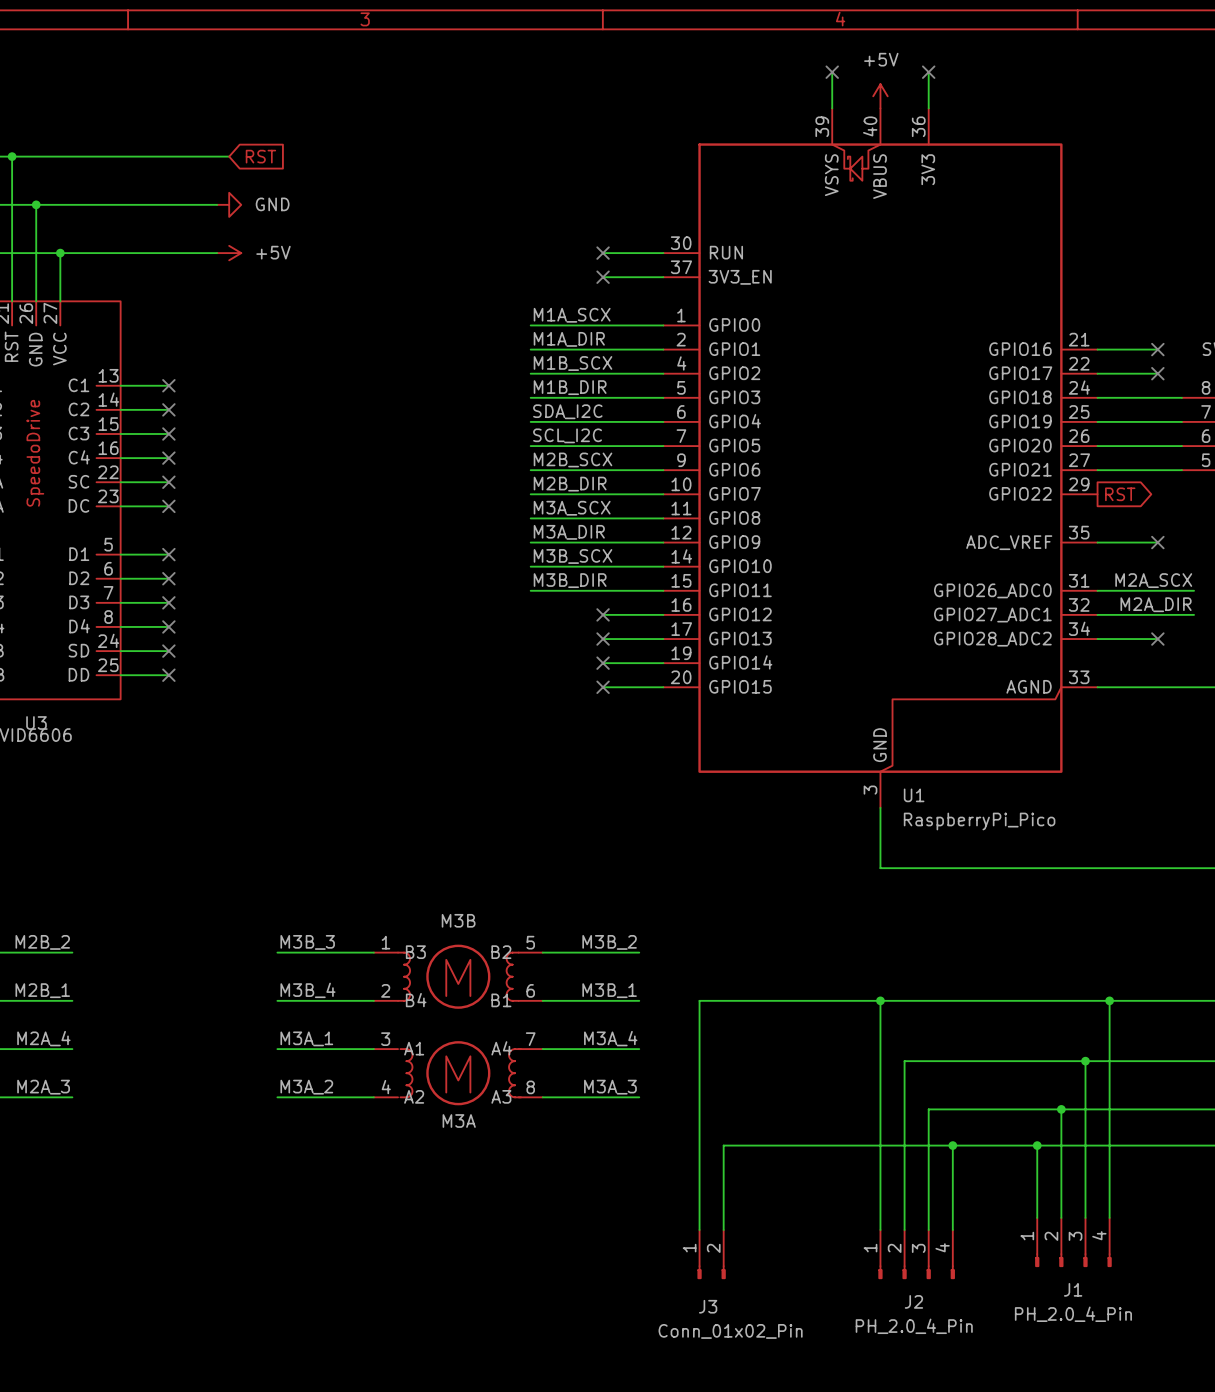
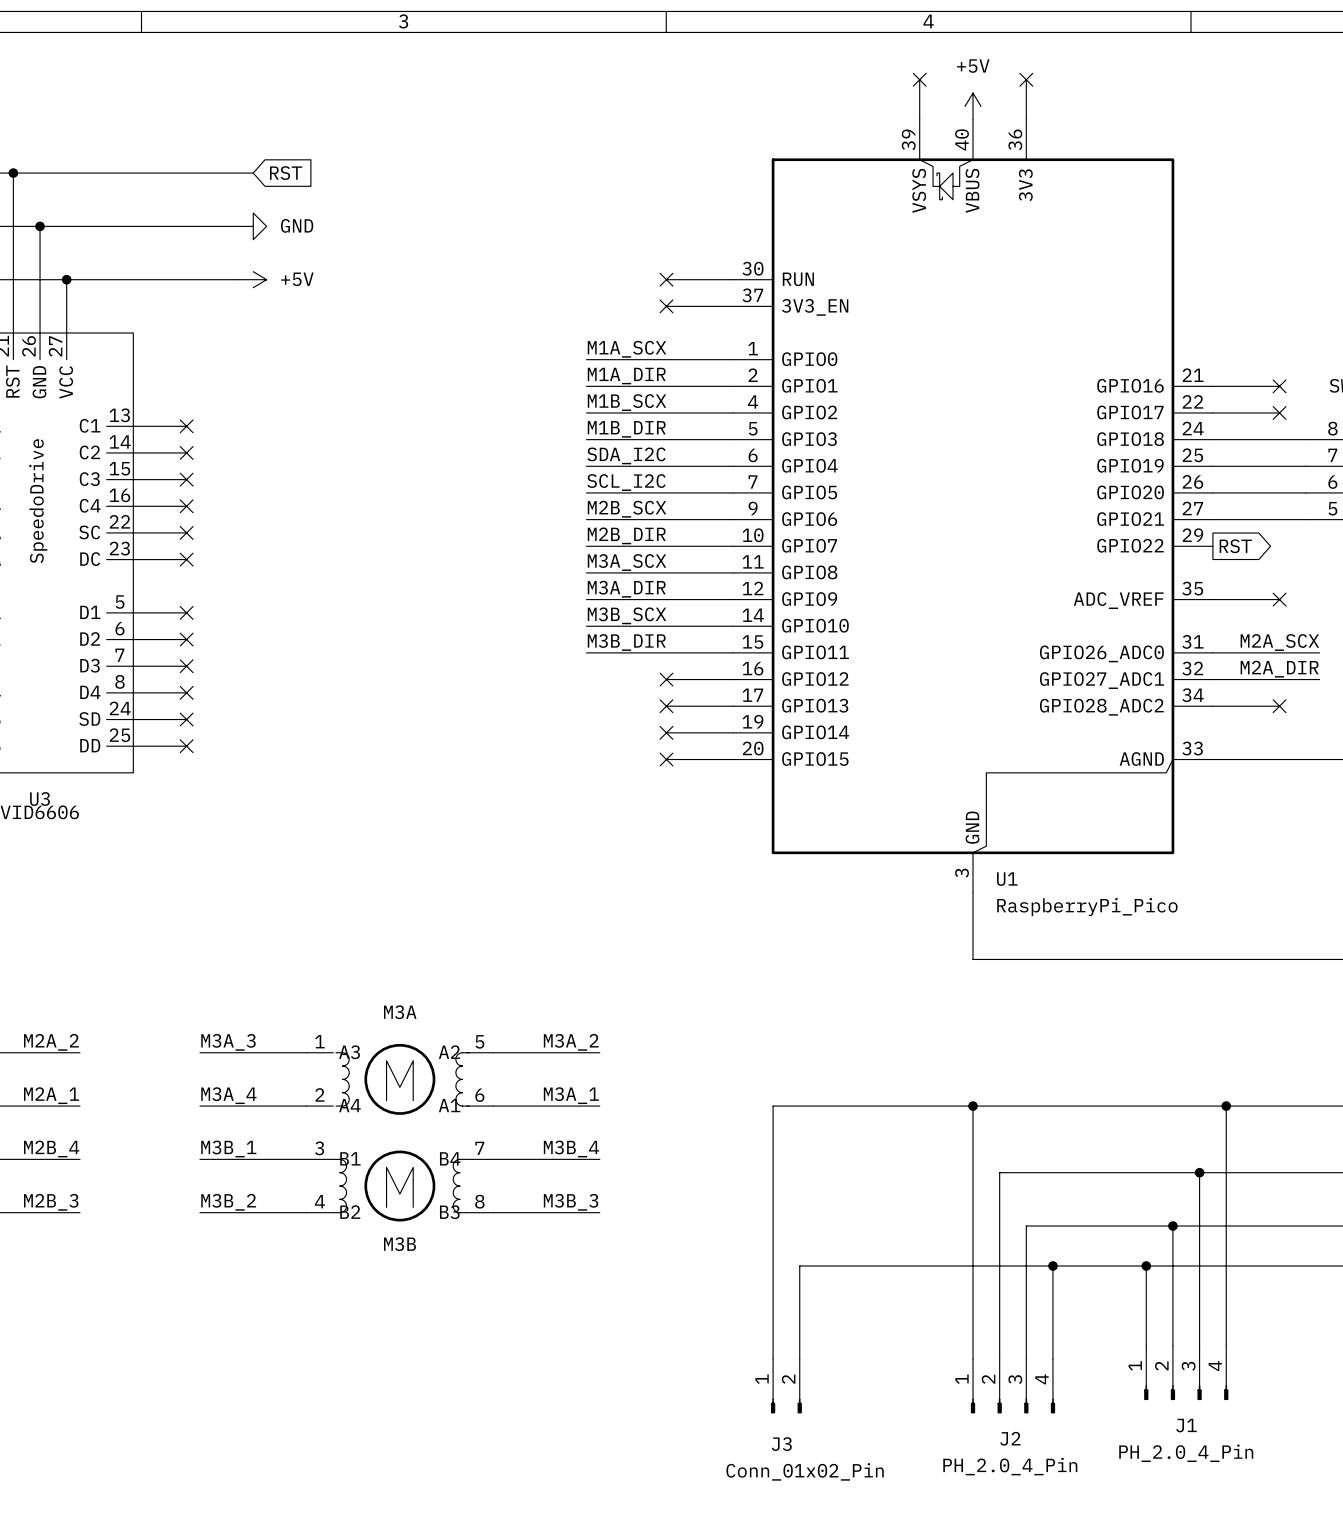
M3B name position: M3B (458, 920) -> M3B (399, 1244)
label: M2B_2 (42, 942) -> M2A_2 (51, 1042)
label: none -> M3A_3 (228, 1042)
label: M3B_3 (307, 942) -> none
M3B pin number: 1 (385, 942) -> 3 (319, 1148)
label: none -> M3A_2 (571, 1042)
M3B pin number: 5 (530, 942) -> 7 (479, 1148)
label: M3B_2 (609, 942) -> none
wire: (277, 952) (373, 952) -> (306, 1052) (199, 1052)
M3B pin name: B3 (415, 952) -> B1 (350, 1158)
M3B pin name: B2 (501, 952) -> B4 (450, 1158)
wire: (542, 952) (639, 952) -> (599, 1052) (493, 1052)
M3B position: (458, 976) -> (399, 1186)
label: M2B_1 (42, 990) -> M2A_1 (51, 1095)
label: none -> M3A_4 (228, 1095)
label: M3B_4 (307, 990) -> none
M3B pin number: 2 (385, 990) -> 4 (319, 1201)
label: none -> M3A_1 (571, 1095)
M3B pin number: 6 (530, 990) -> 8 (479, 1201)
label: M3B_1 (609, 990) -> none
wire: (277, 1000) (373, 1000) -> (306, 1106) (199, 1106)
M3B pin name: B4 (416, 1000) -> B2 (350, 1212)
M3B pin name: B1 (501, 1000) -> B3 (449, 1212)
wire: (542, 1000) (639, 1000) -> (599, 1106) (493, 1106)
label: M2A_4 (43, 1038) -> M2B_4 (51, 1148)
label: none -> M3B_1 (228, 1148)
label: M3A_1 (306, 1038) -> none
label: none -> M3B_4 (571, 1148)
label: M3A_4 (610, 1038) -> none
M3A pin number: 3 (385, 1039) -> 1 (319, 1041)
M3A pin number: 7 (530, 1039) -> 5 (479, 1041)
M3A pin name: A1 (414, 1048) -> A3 (349, 1052)
M3A pin name: A4 (501, 1048) -> A2 (449, 1052)
wire: (277, 1049) (373, 1049) -> (306, 1159) (199, 1159)
wire: (542, 1049) (639, 1049) -> (599, 1159) (493, 1159)
M3A position: (458, 1073) -> (399, 1079)
label: M2A_3 (43, 1087) -> M2B_3 (51, 1202)
label: none -> M3B_2 (228, 1202)
label: M3A_2 (306, 1087) -> none
M3A pin number: 4 (386, 1087) -> 2 (319, 1094)
label: none -> M3B_3 (571, 1202)
M3A pin number: 8 (530, 1087) -> 6 (479, 1095)
label: M3A_3 (610, 1087) -> none
M3A pin name: A2 (414, 1096) -> A4 (349, 1105)
M3A pin name: A3 (501, 1096) -> A1 (449, 1105)
wire: (277, 1097) (373, 1097) -> (306, 1212) (199, 1212)
wire: (542, 1097) (639, 1097) -> (599, 1212) (493, 1212)
M3A name position: M3A (459, 1121) -> M3A (400, 1012)

